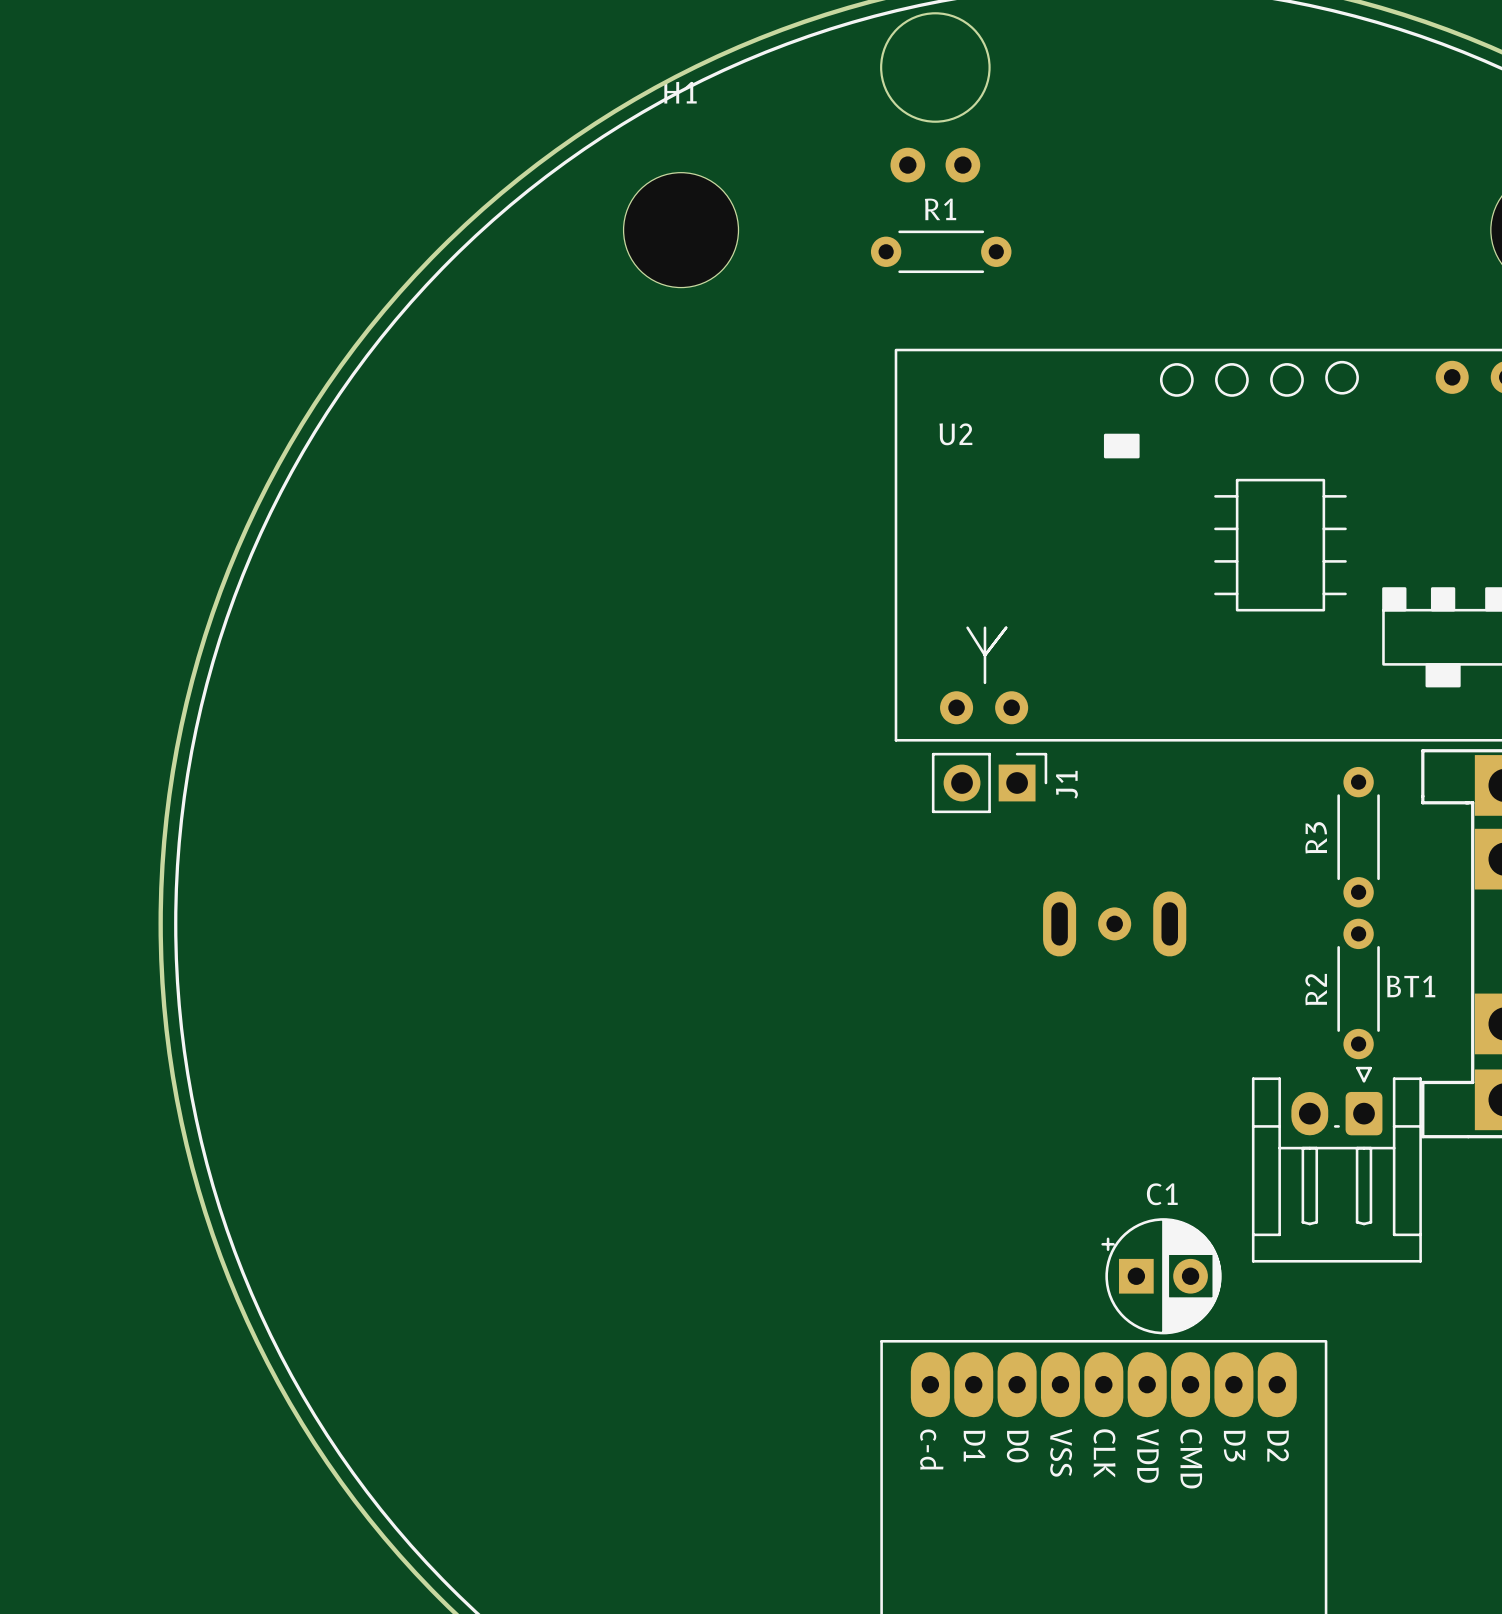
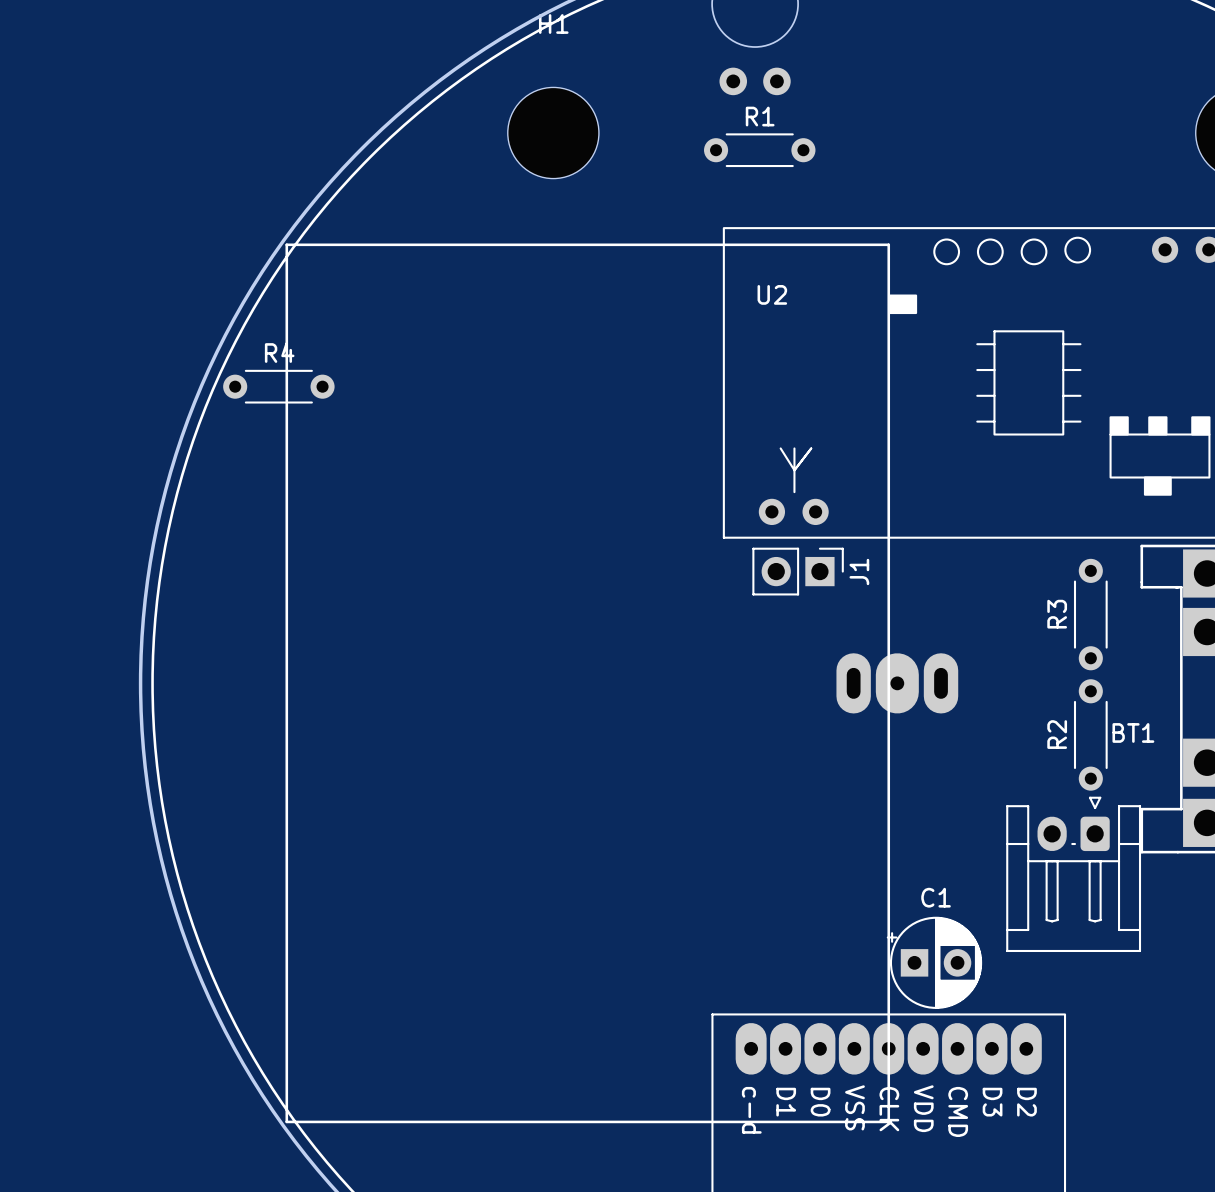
line: none -> (286, 244) (286, 1121) (888, 1121) (888, 244) (286, 244)
R4: none -> (278, 386)
part footprint: [1043, 891, 1187, 957] -> [836, 653, 959, 714]

